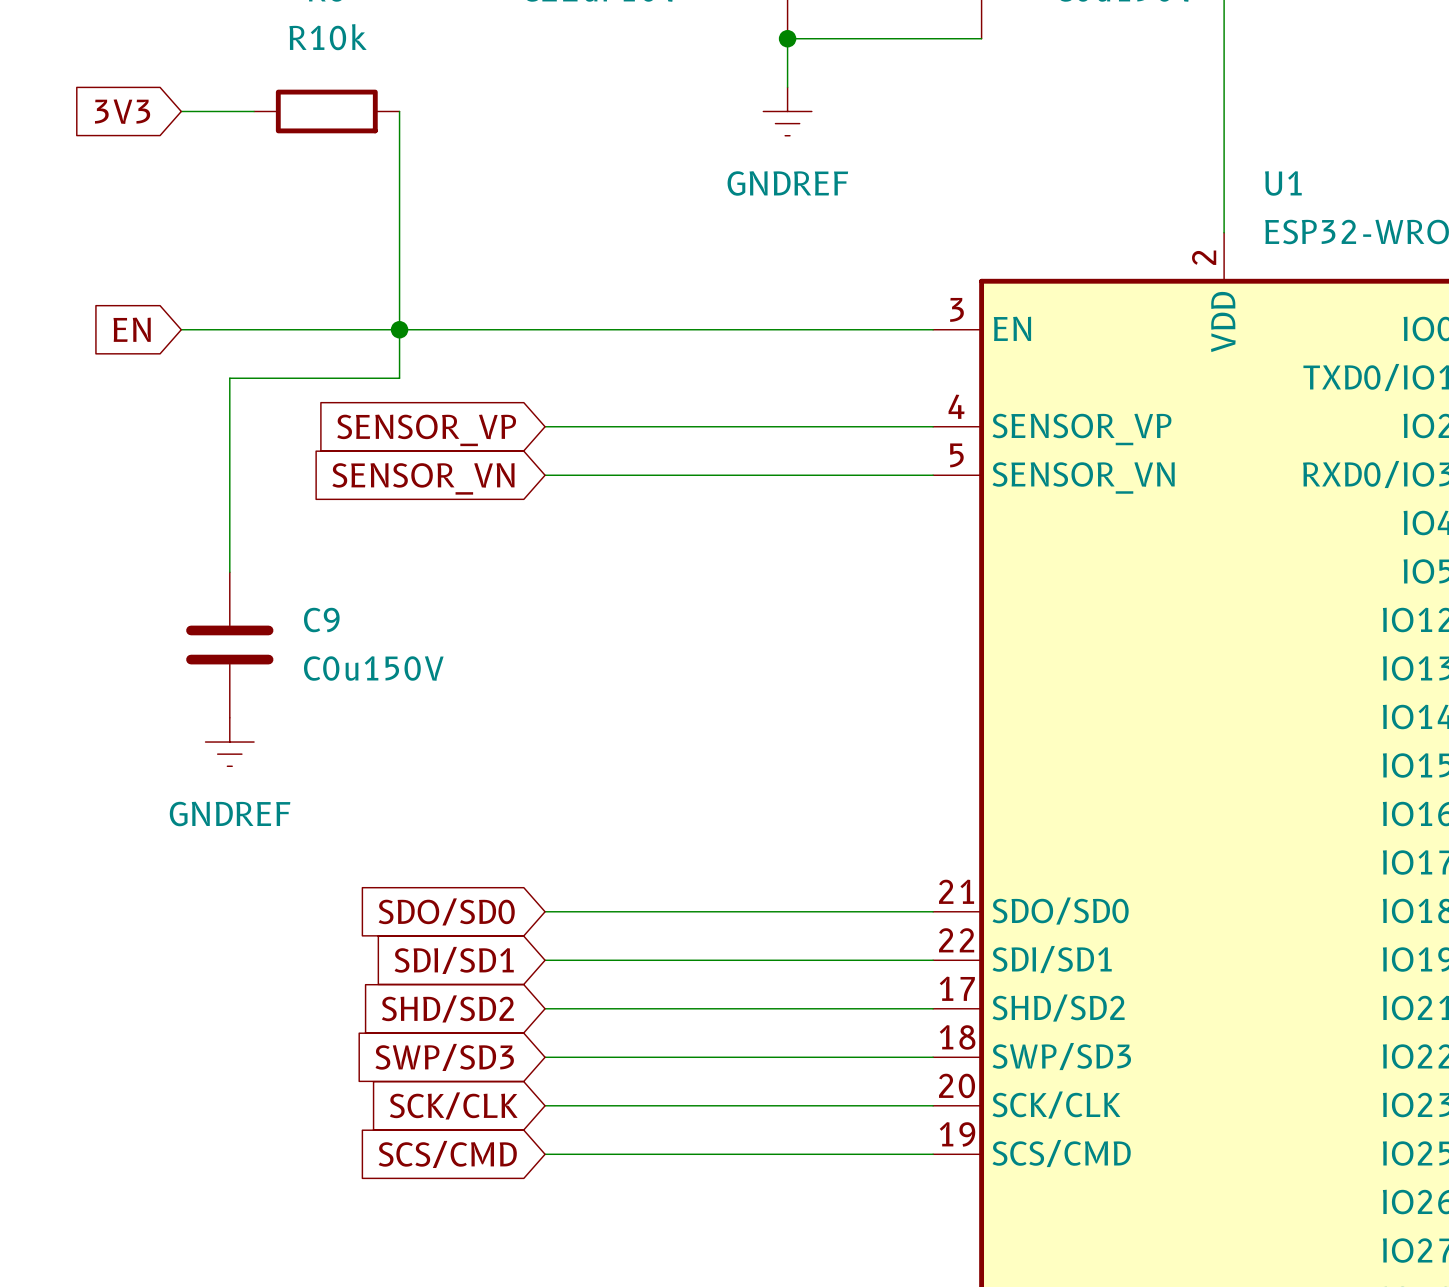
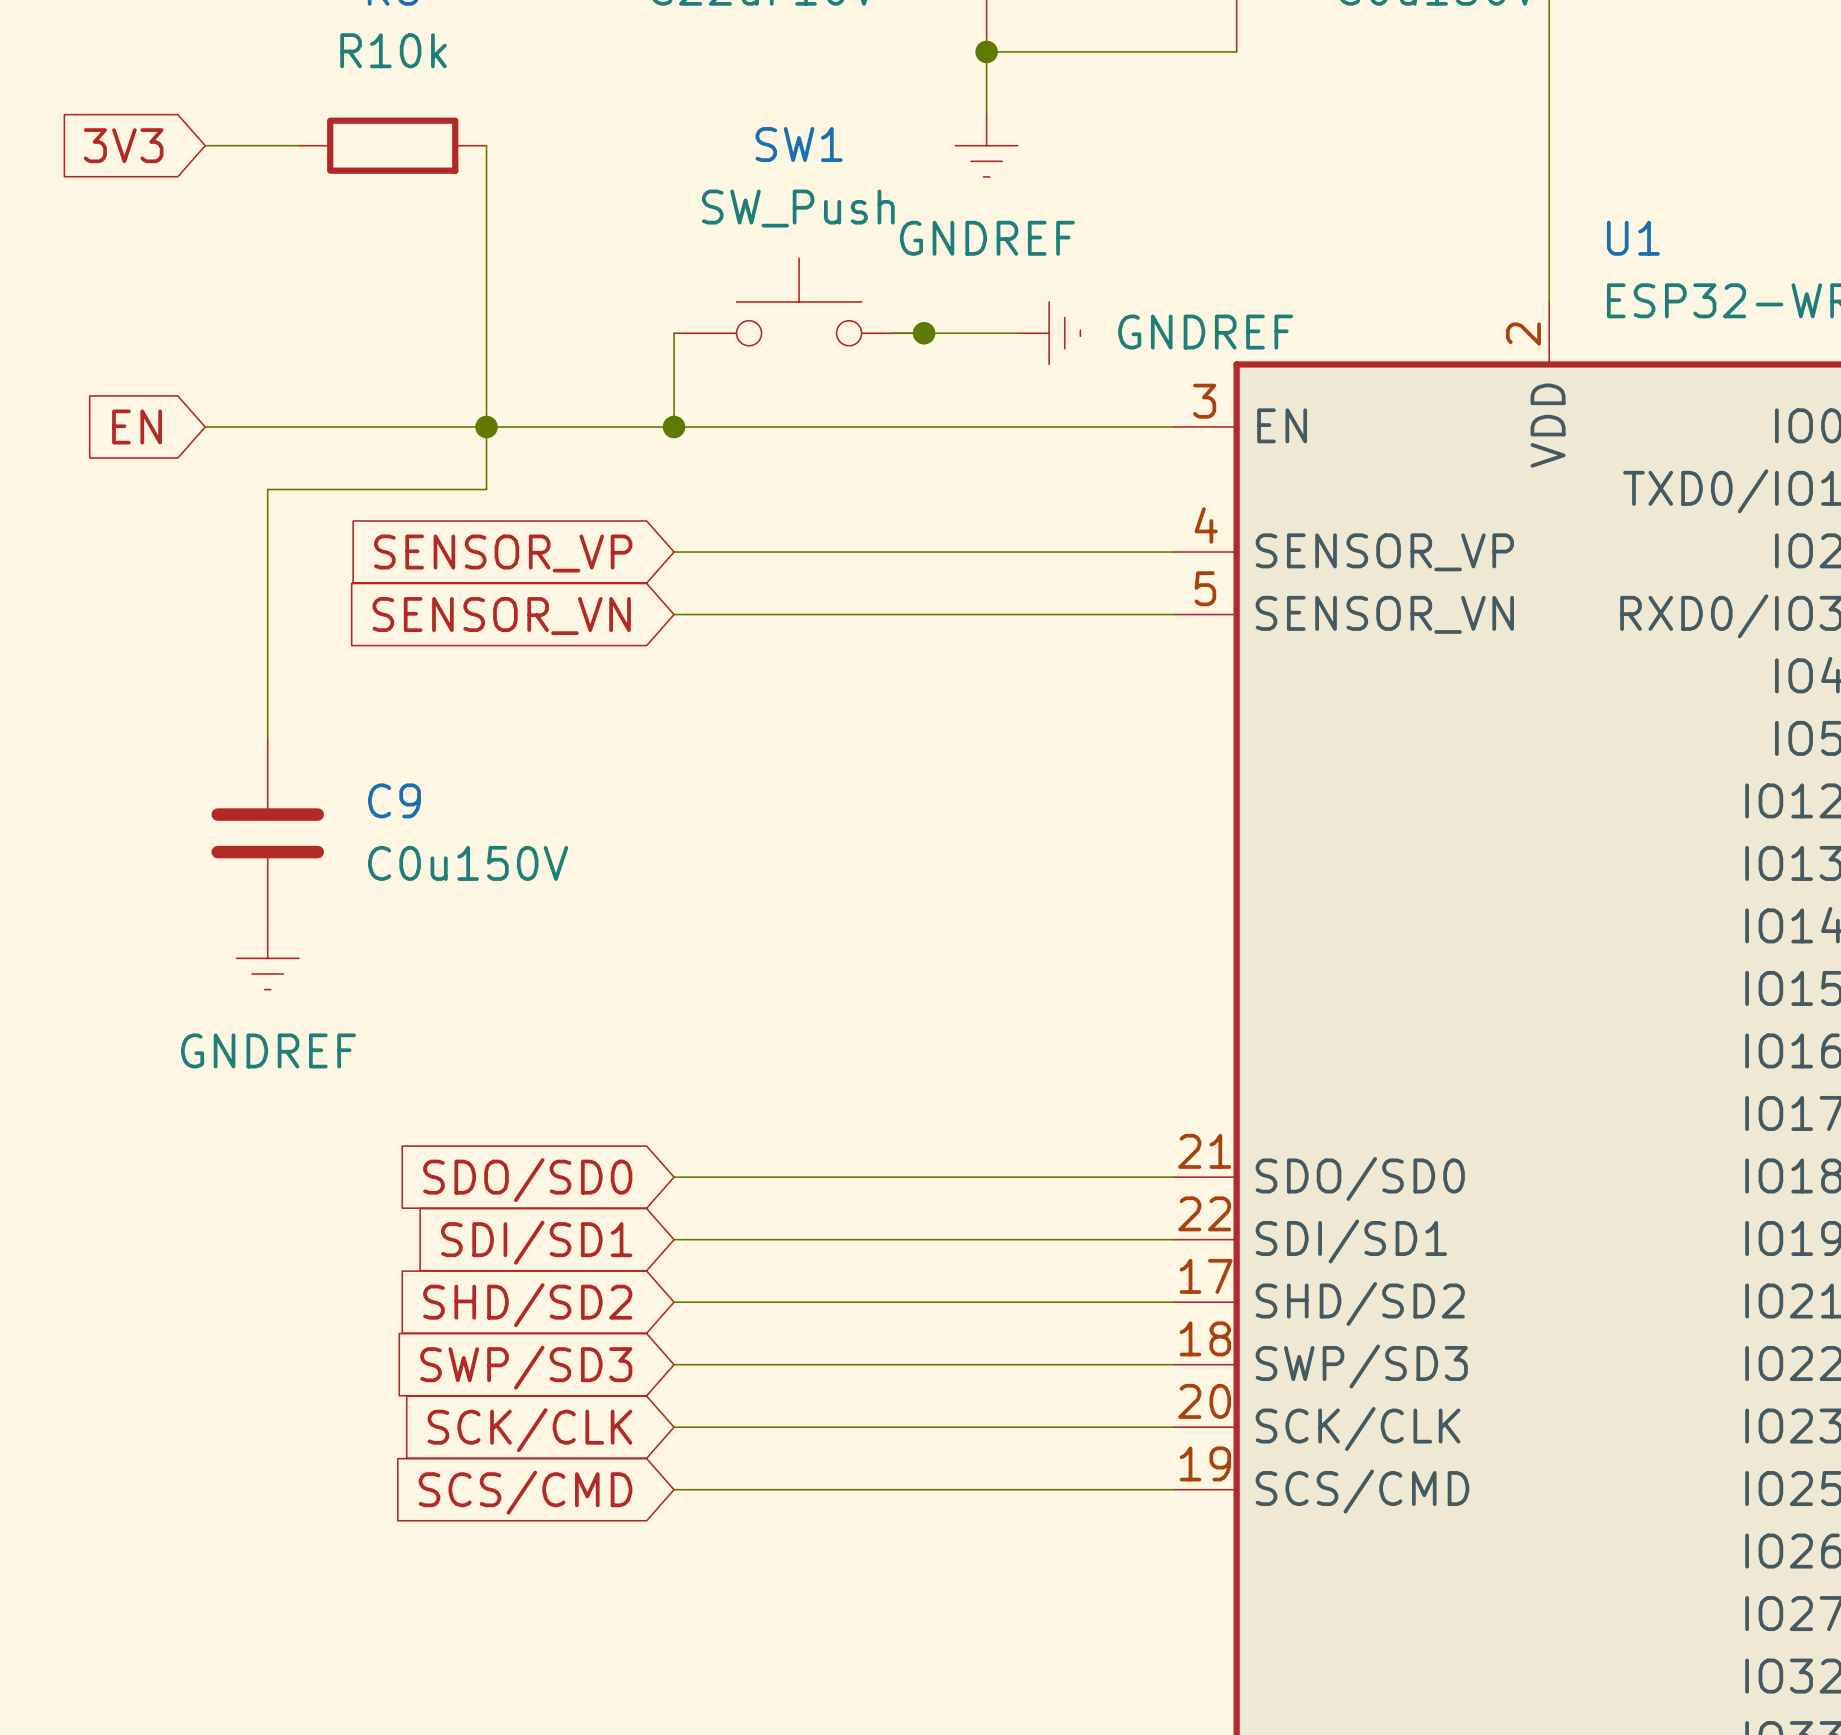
SW1: none -> SW_Push (799, 301)
wire: none -> (674, 333) (674, 427)
wire: none -> (892, 333) (1017, 333)
junction: none -> (924, 333)
power symbol: none -> GNDREF (1049, 333)
junction: none -> (674, 427)

